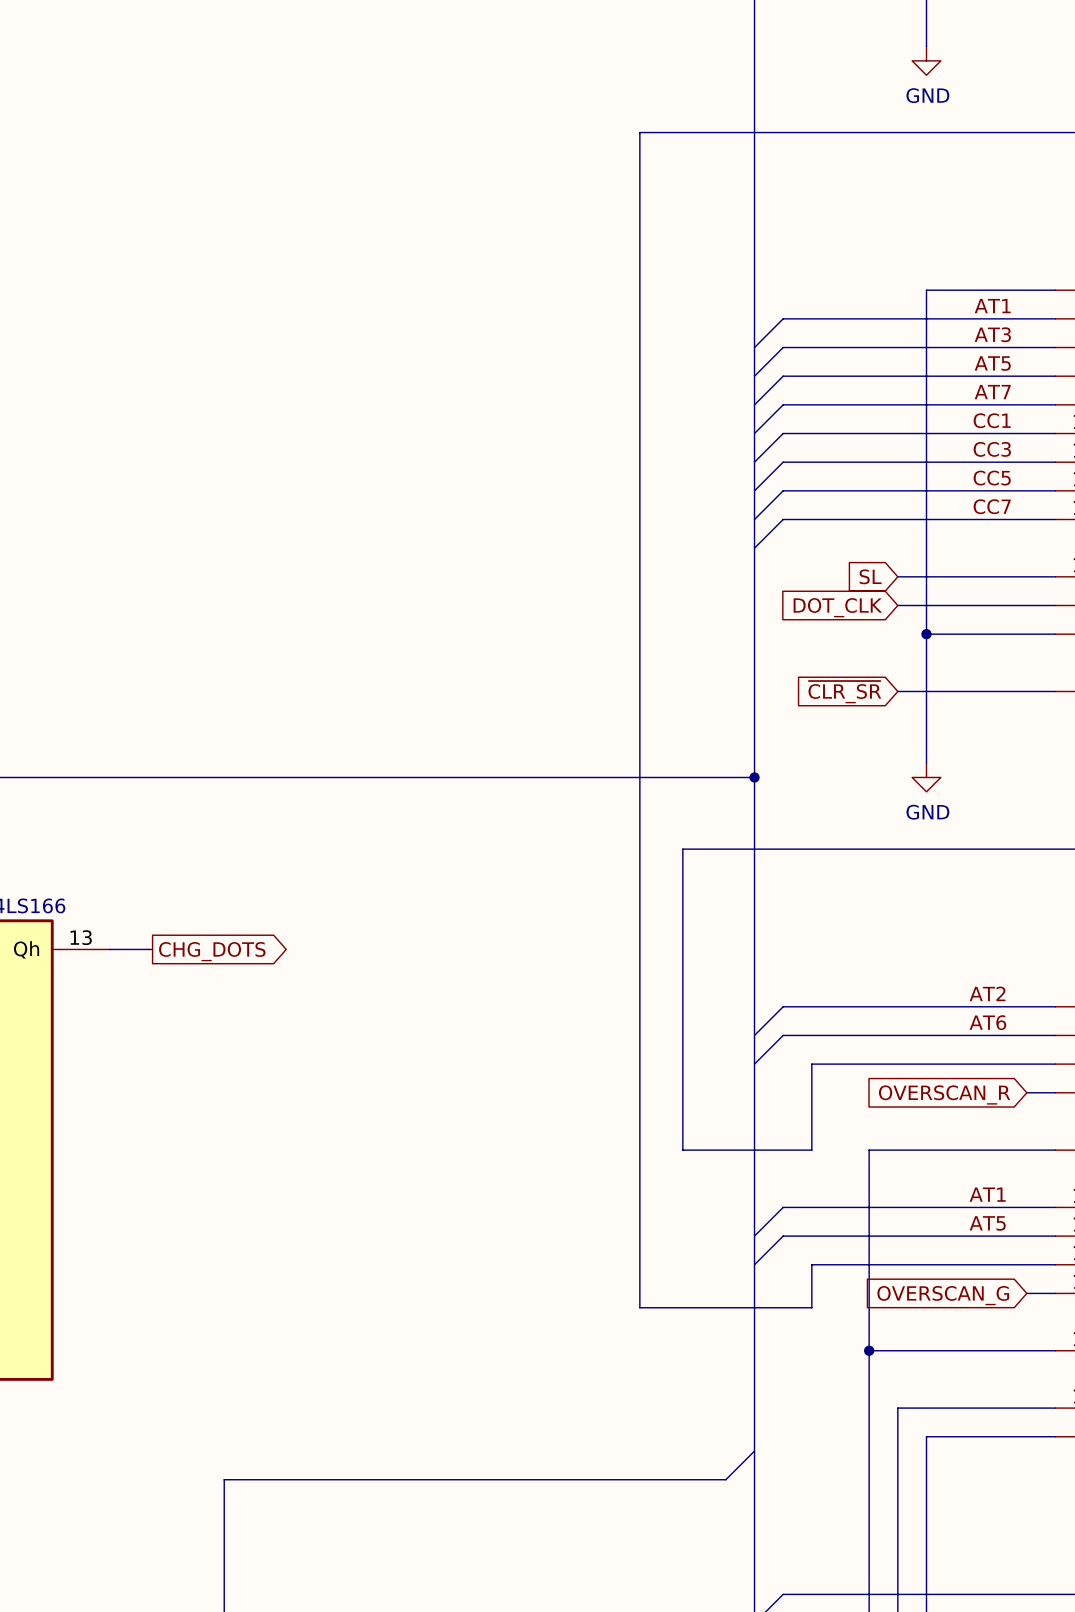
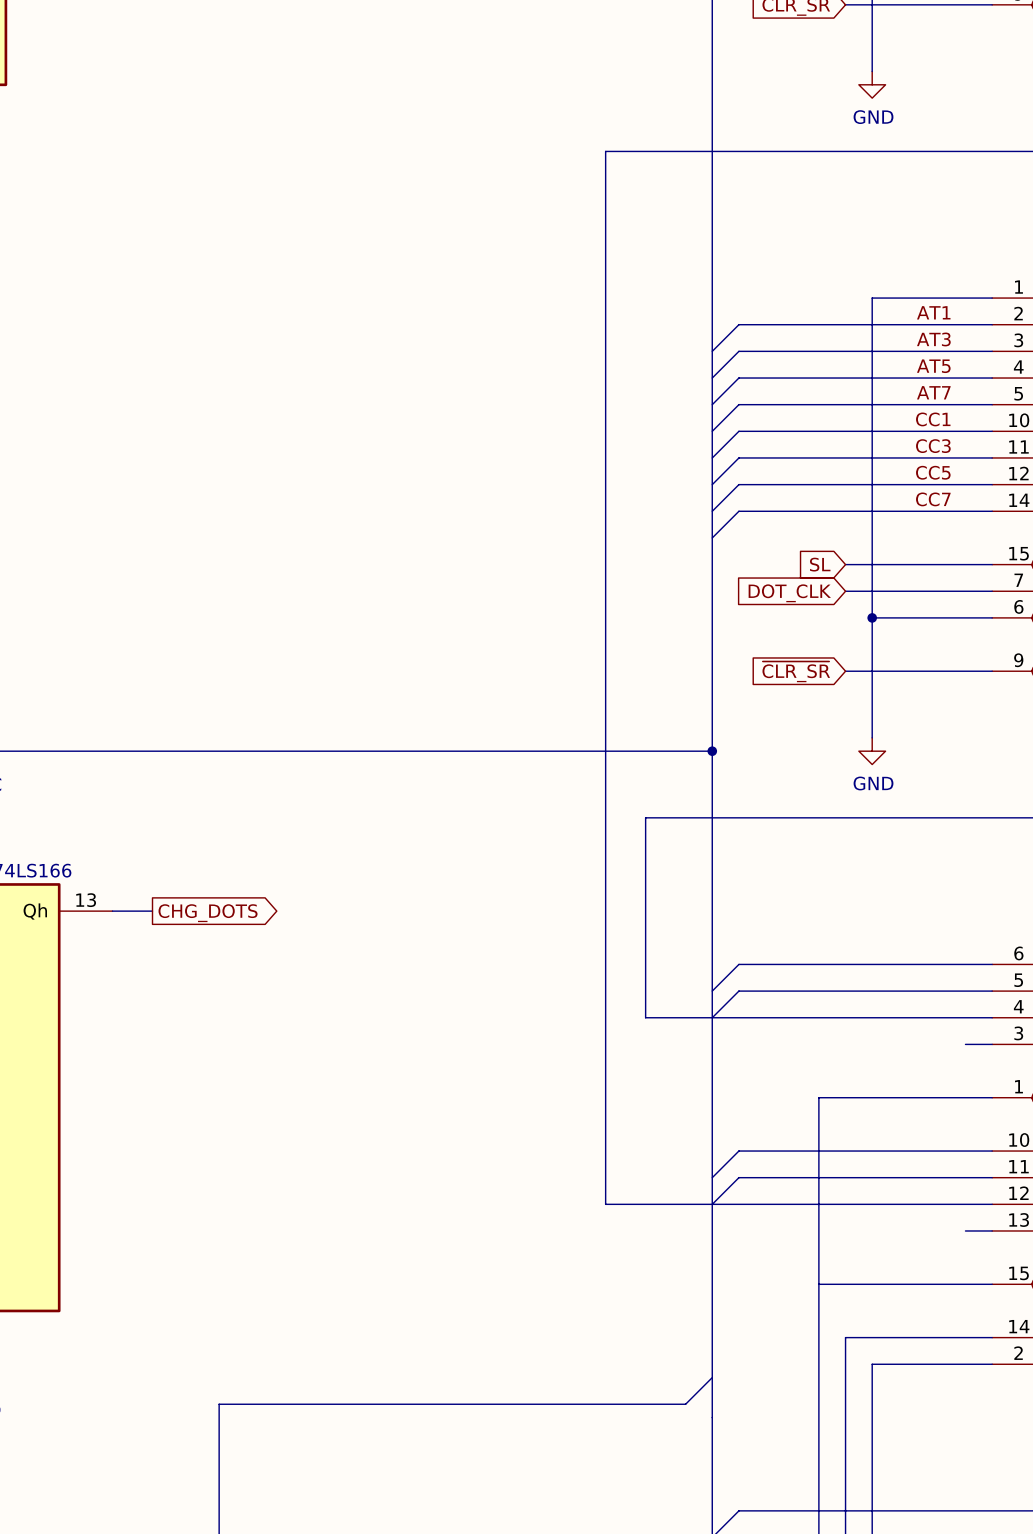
label: AT2 (987, 993) -> none
label: AT6 (987, 1022) -> none
wire: (682, 1064) (682, 1150) (811, 1150) (811, 1064) -> (645, 1017) (765, 1017)
global label: OVERSCAN_R (944, 1094) -> none
label: AT1 (987, 1194) -> none
label: AT5 (987, 1223) -> none
wire: (639, 1264) (639, 1307) (811, 1307) (811, 1264) -> (605, 1204) (765, 1204)
global label: OVERSCAN_G (943, 1295) -> none
junction: (869, 1350) -> none

